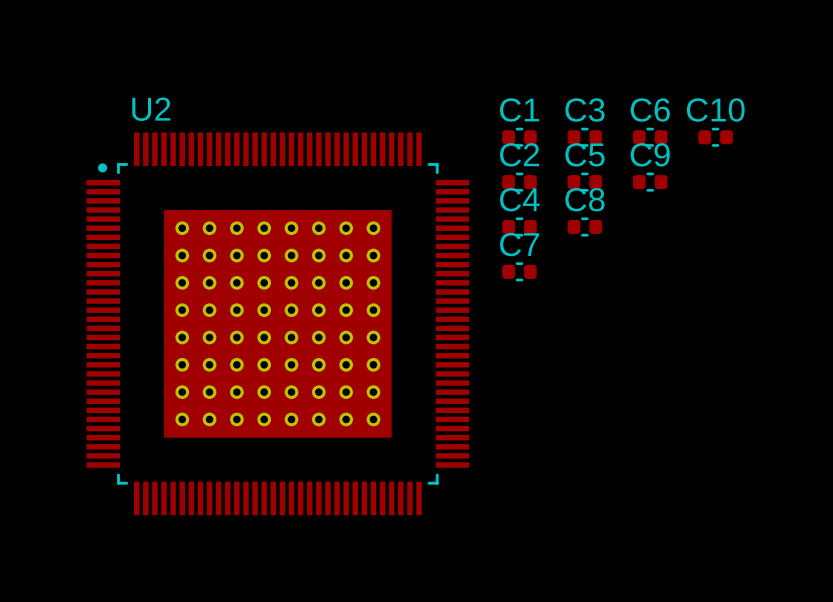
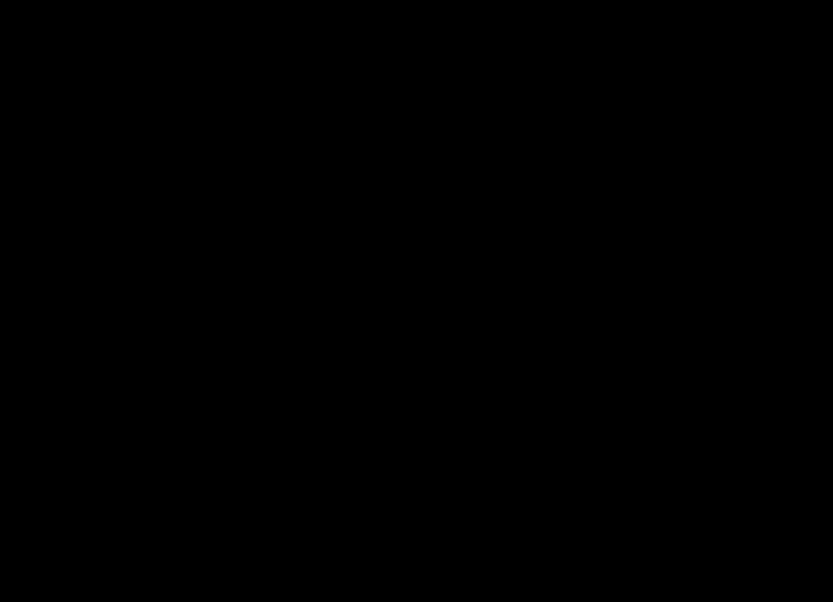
C1: (519, 137) -> none
C3: (584, 137) -> none
C6: (650, 137) -> none
C10: (715, 137) -> none
C2: (519, 182) -> none
C5: (584, 182) -> none
C9: (650, 182) -> none
C4: (519, 226) -> none
C8: (584, 226) -> none
C7: (519, 271) -> none
U2: (277, 323) -> none

